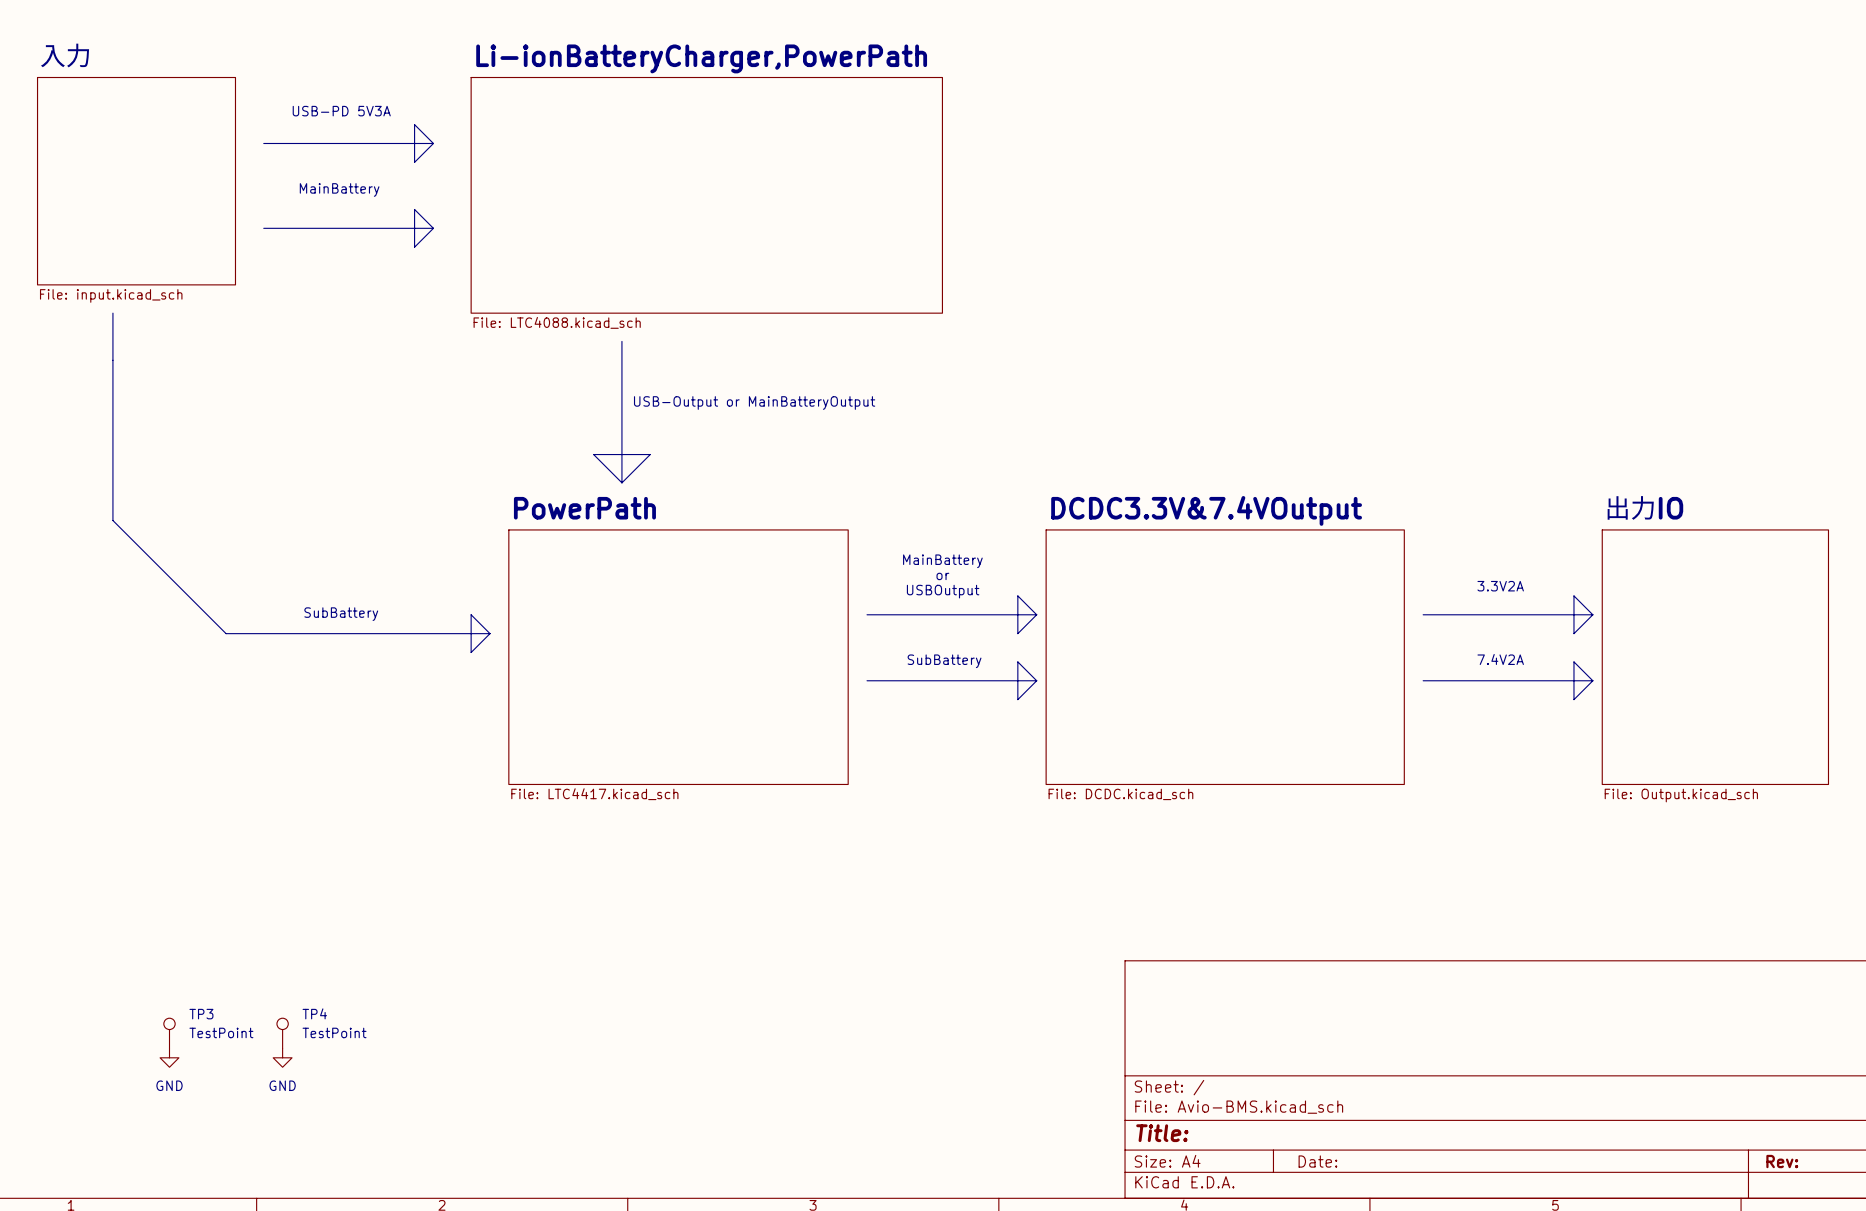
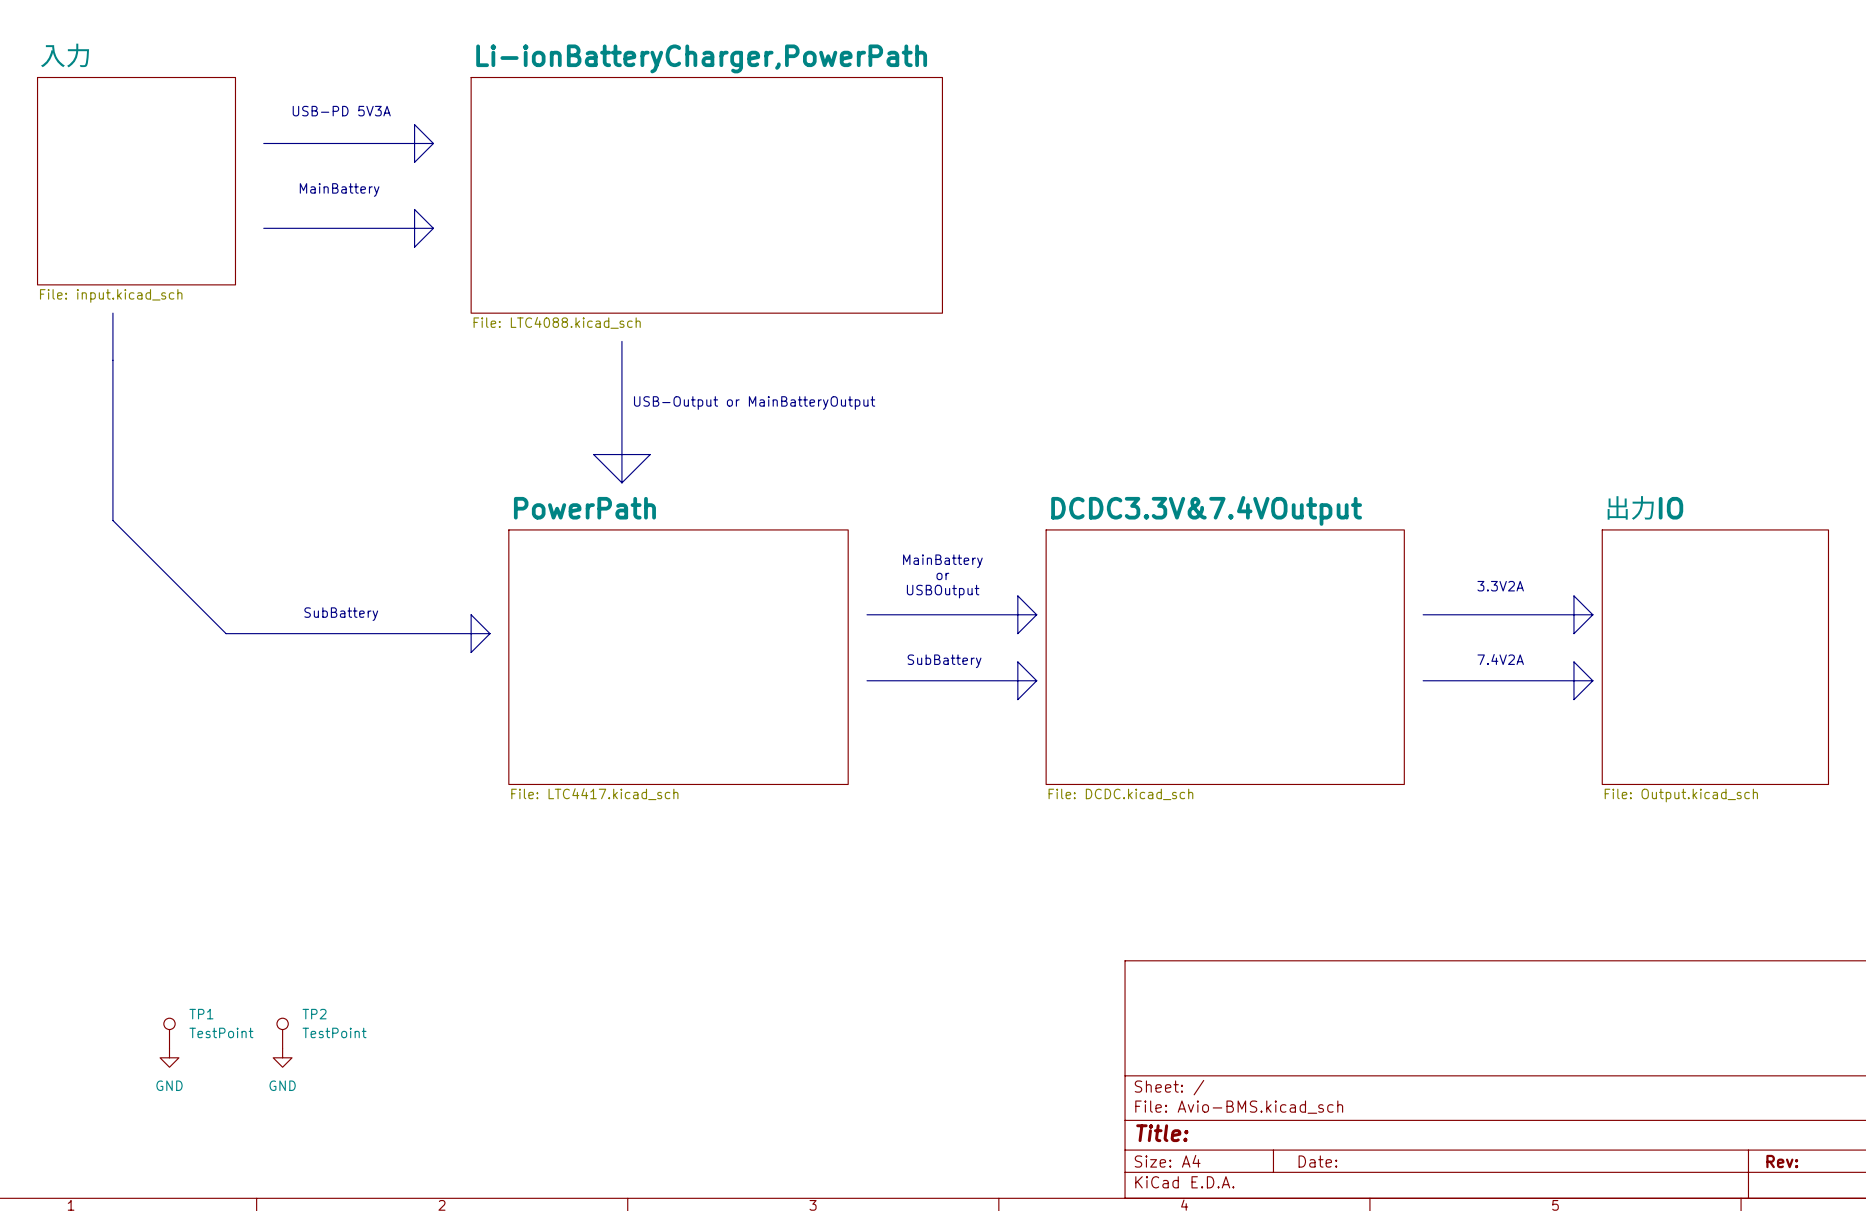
TP4 name: TP4 (314, 1013) -> TP2 (314, 1014)
TP3 name: TP3 (201, 1014) -> TP1 (201, 1014)

